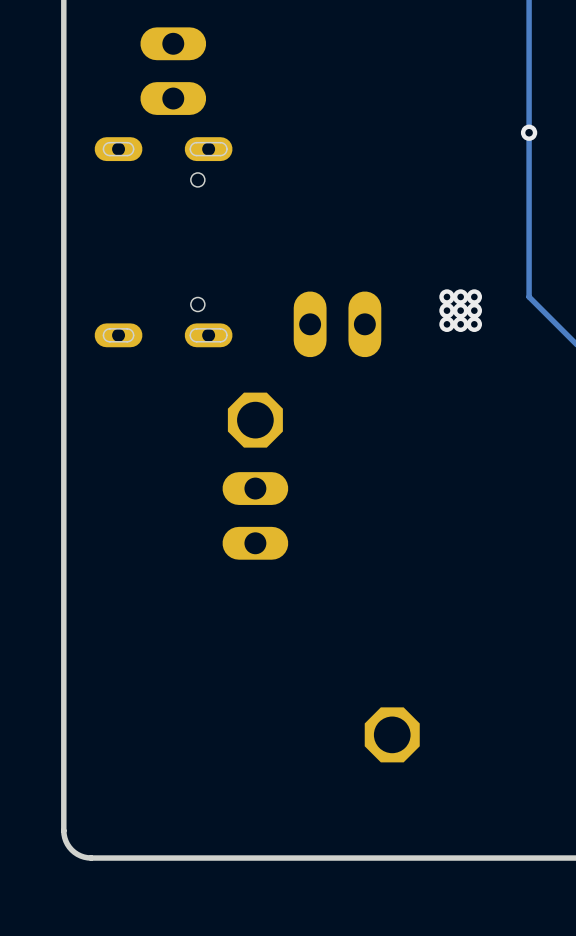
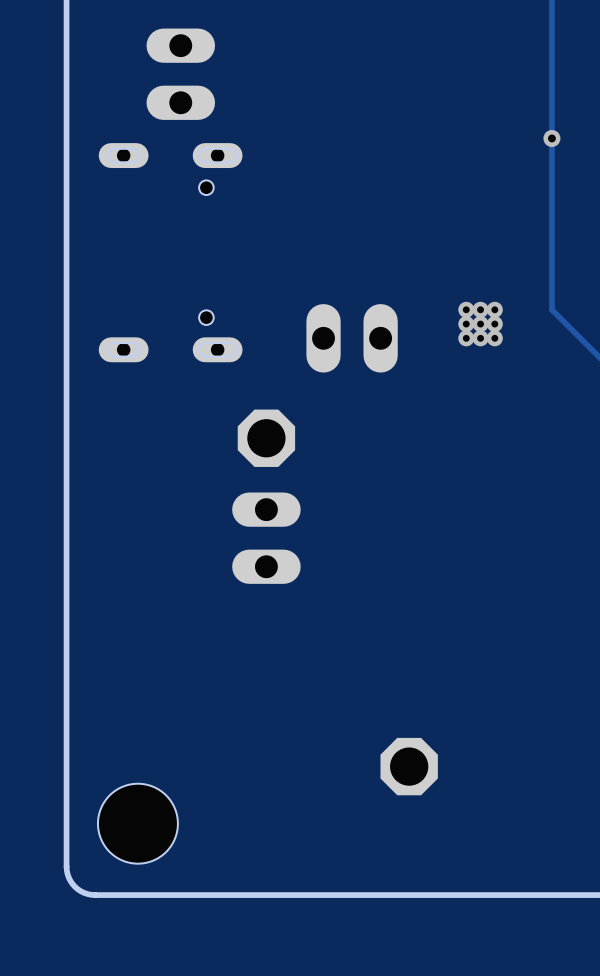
hole: none -> (137, 823)

